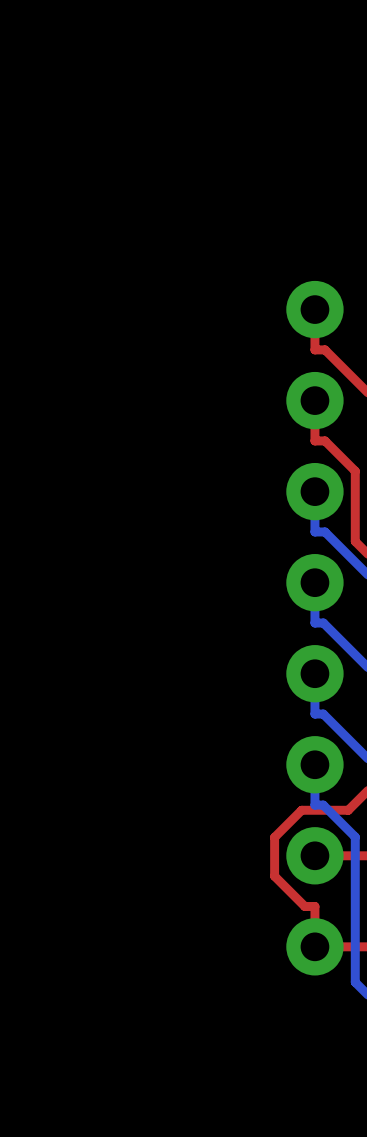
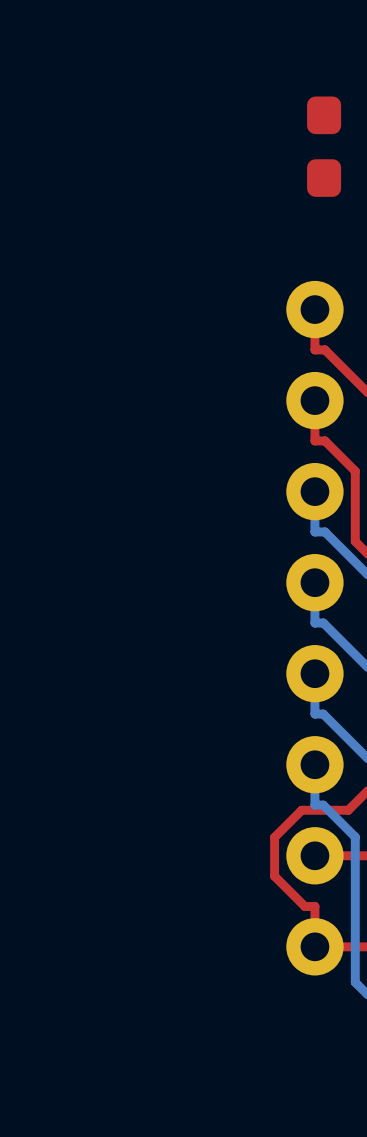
part: none -> (324, 146)

